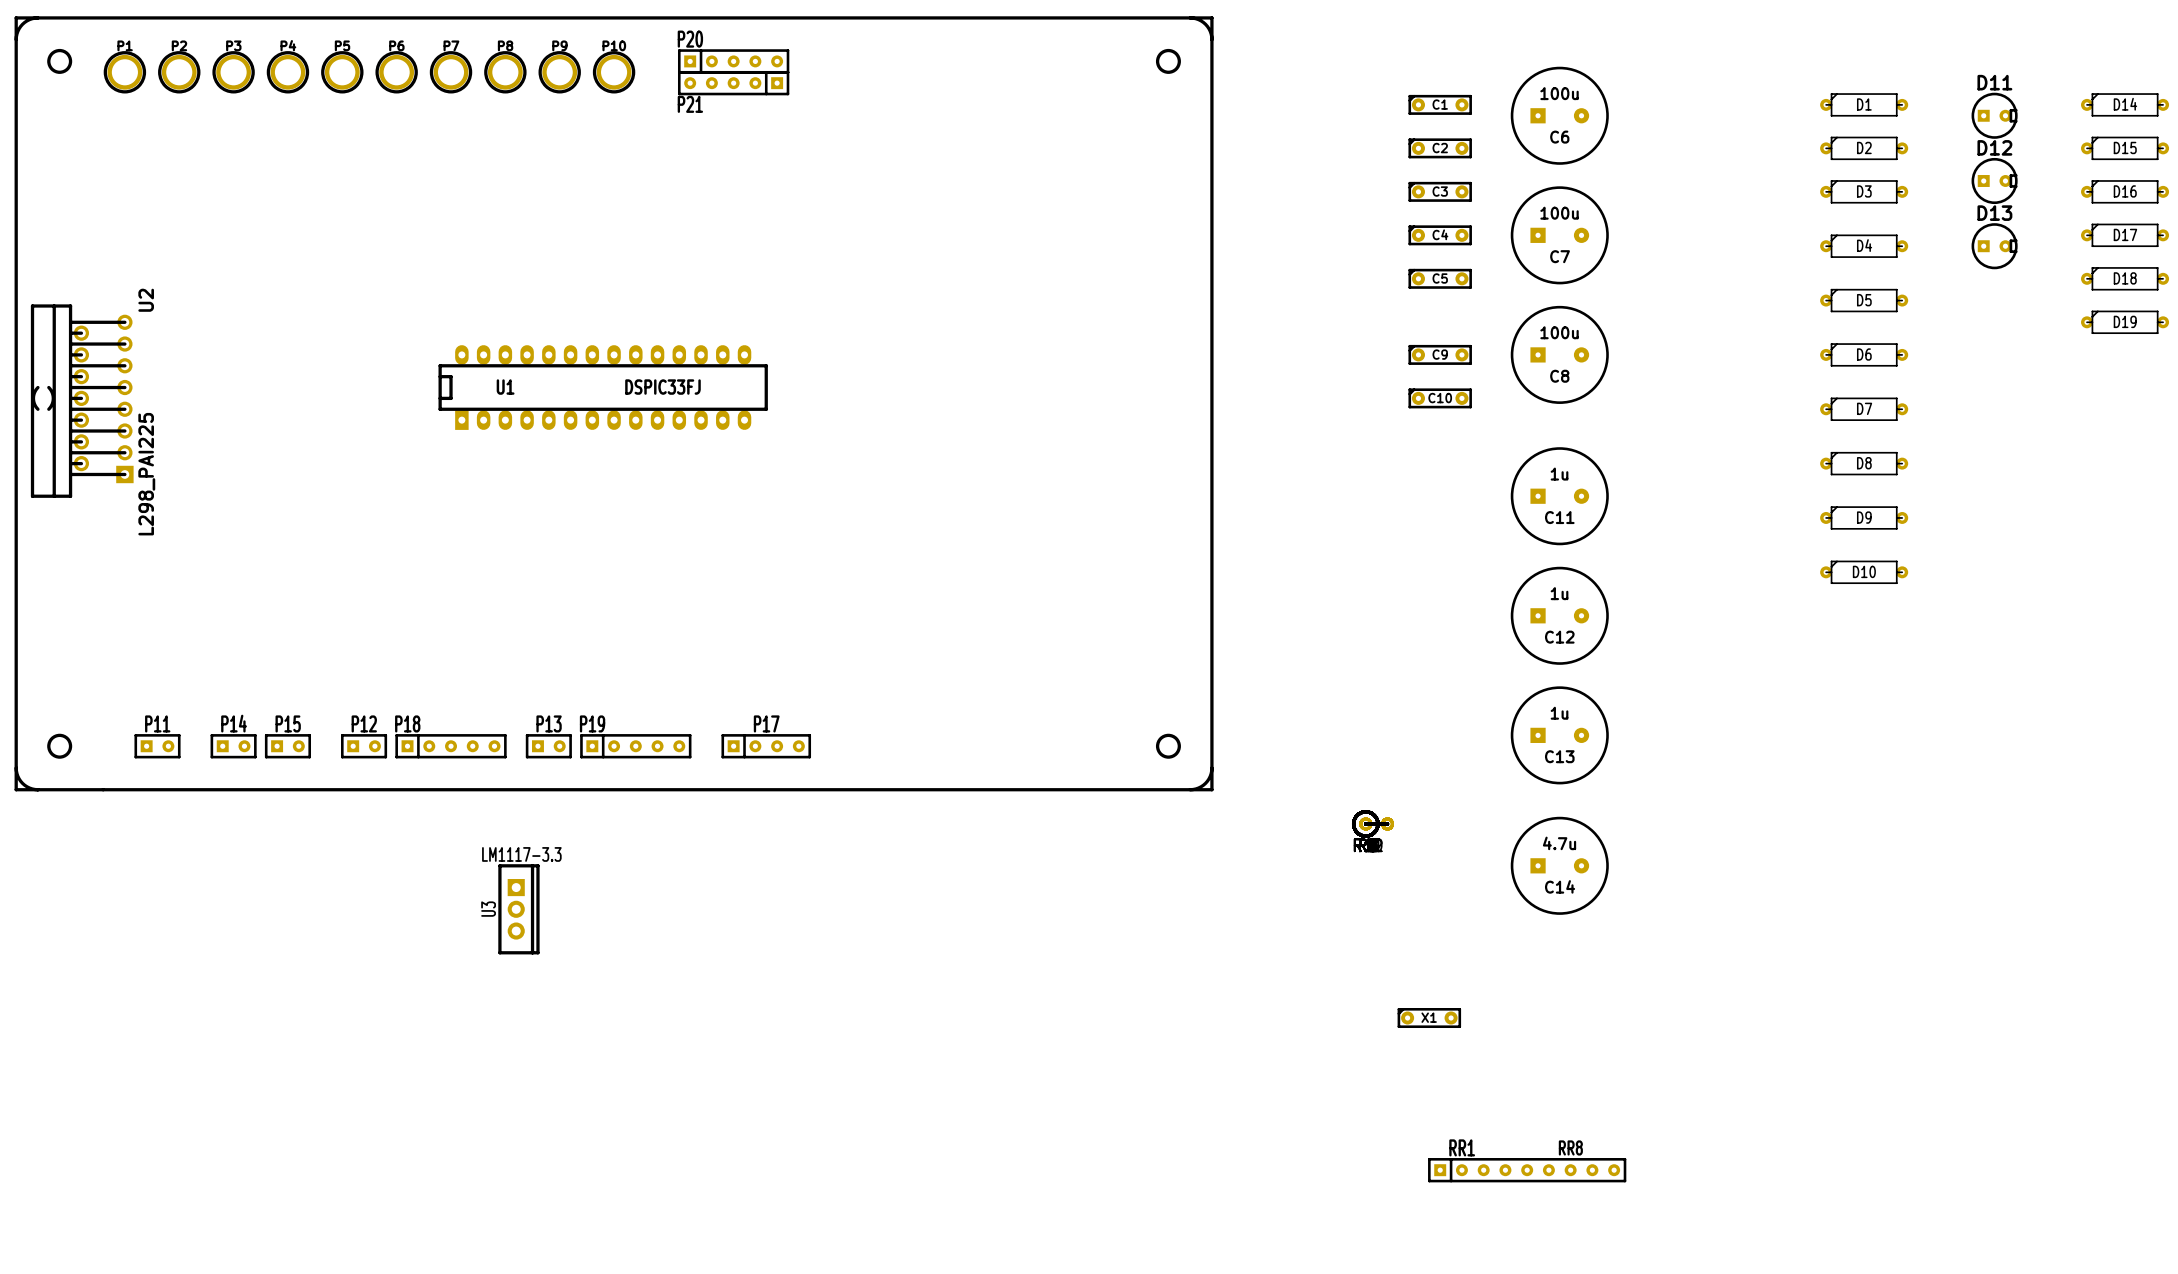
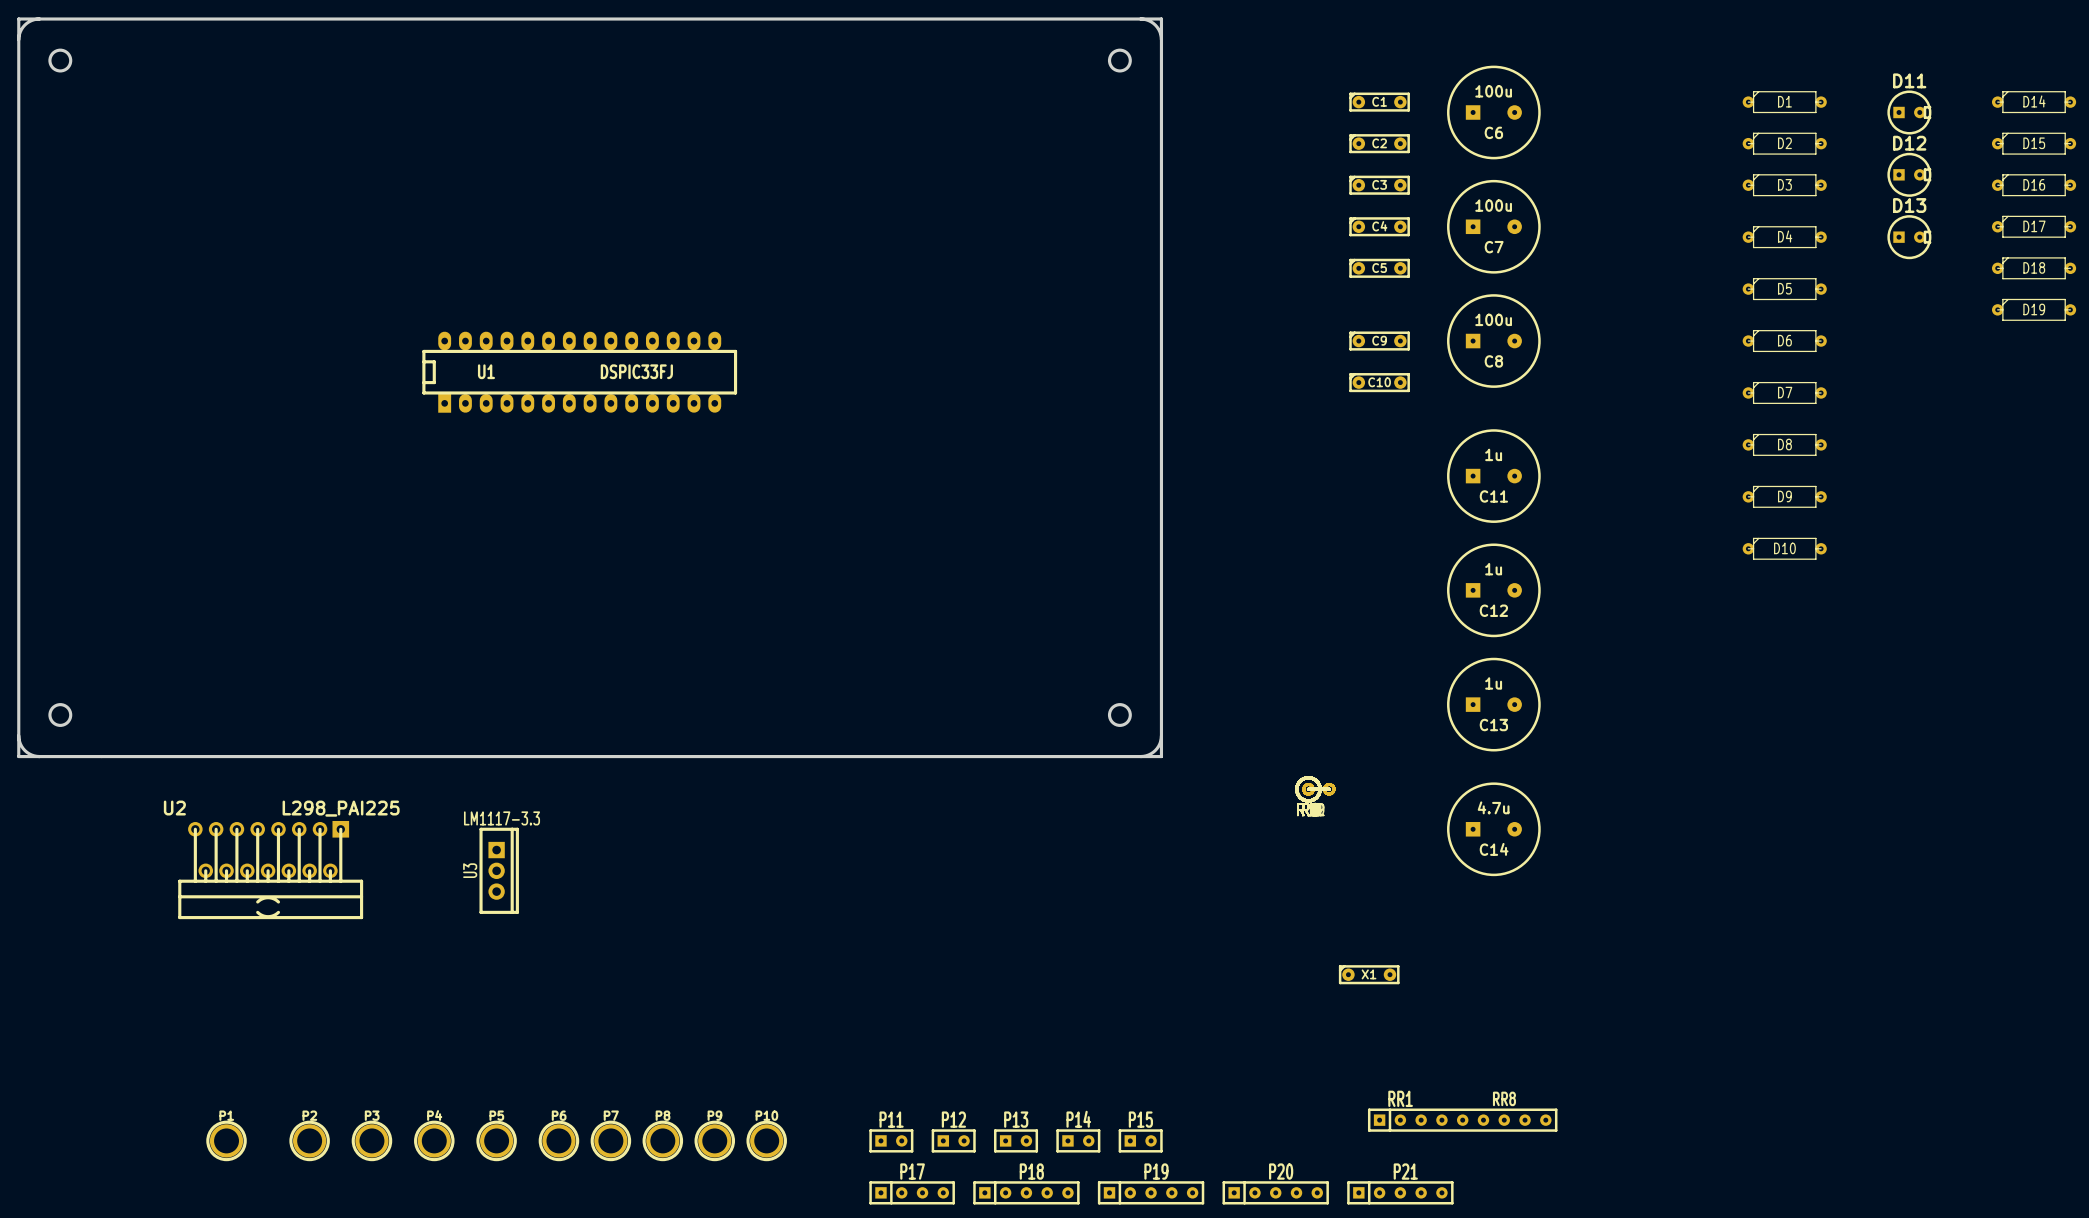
P20 name position: P20 (690, 39) -> P20 (1281, 1171)
P20 position: (733, 61) -> (1275, 1192)
P1 position: (124, 72) -> (226, 1140)
P2 position: (179, 72) -> (309, 1140)
P3 position: (233, 72) -> (371, 1140)
P4 position: (287, 72) -> (434, 1140)
P5 position: (342, 72) -> (496, 1140)
P6 position: (396, 72) -> (558, 1140)
P7 position: (451, 72) -> (610, 1140)
P8 position: (505, 72) -> (662, 1140)
P9 position: (559, 72) -> (714, 1140)
P10 position: (614, 72) -> (766, 1140)
P21 rotation: 0° (733, 83) -> 180° (1400, 1192)
P21 position: (733, 83) -> (1400, 1192)
P21 name position: P21 (690, 104) -> P21 (1405, 1171)
U2 rotation: 0° (82, 401) -> 90° counterclockwise (270, 870)
U2 position: (82, 401) -> (270, 870)
P18 name position: P18 (407, 723) -> P18 (1031, 1171)
P19 name position: P19 (592, 723) -> P19 (1156, 1171)
P11 position: (157, 746) -> (891, 1140)
P14 position: (233, 746) -> (1078, 1140)
P15 position: (287, 746) -> (1140, 1140)
P12 position: (364, 746) -> (953, 1140)
P18 position: (451, 746) -> (1026, 1192)
P13 position: (548, 746) -> (1016, 1140)
P19 position: (635, 746) -> (1151, 1192)
P17 position: (766, 746) -> (912, 1192)

